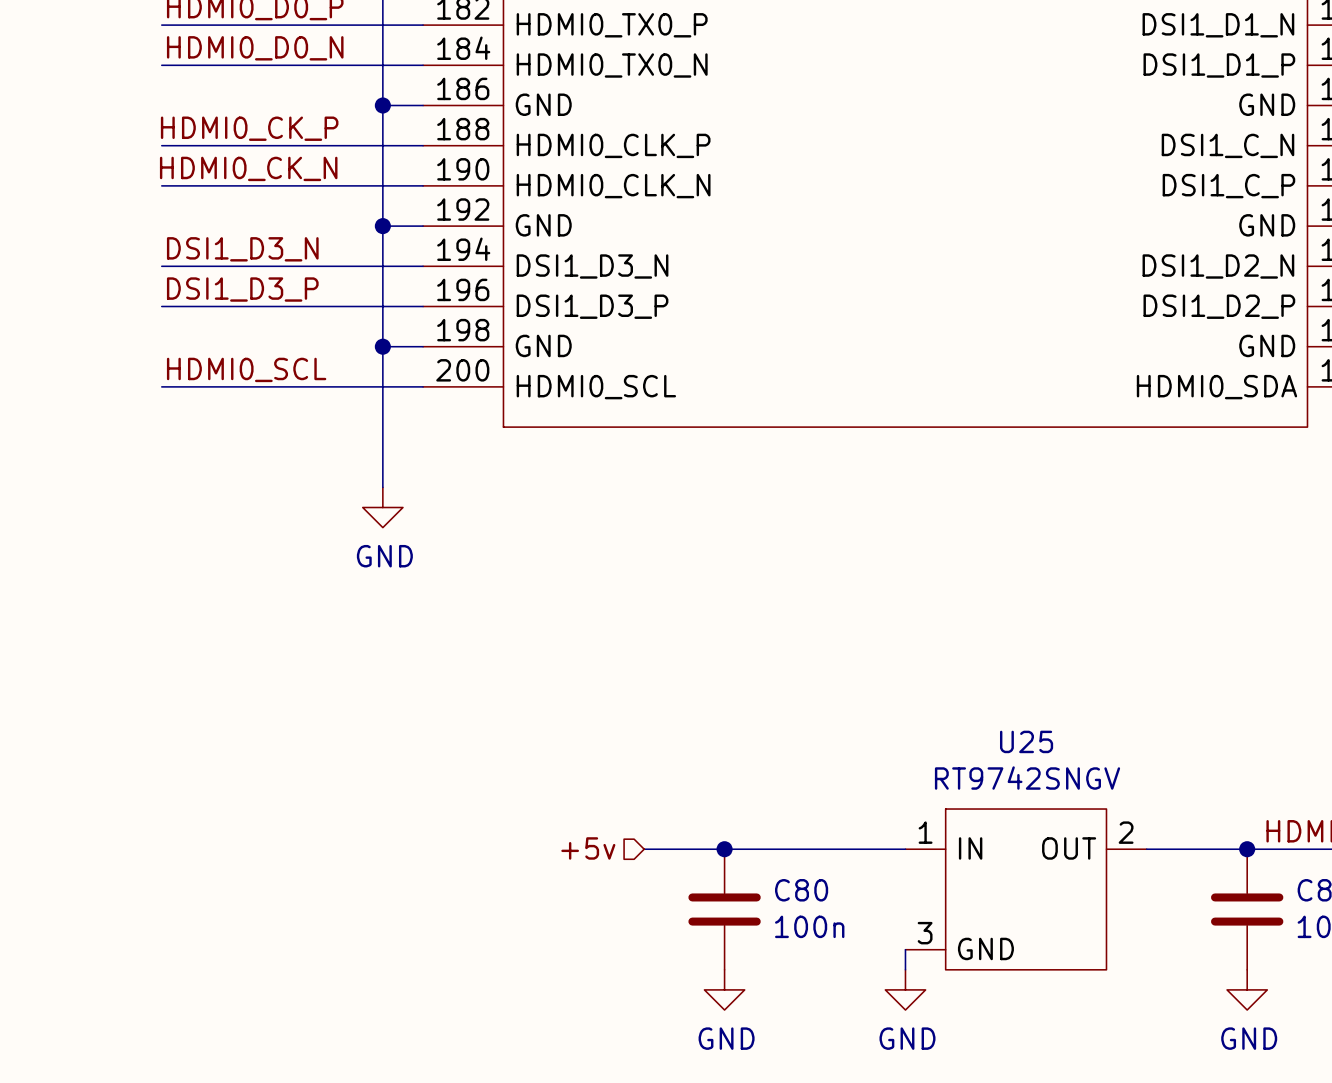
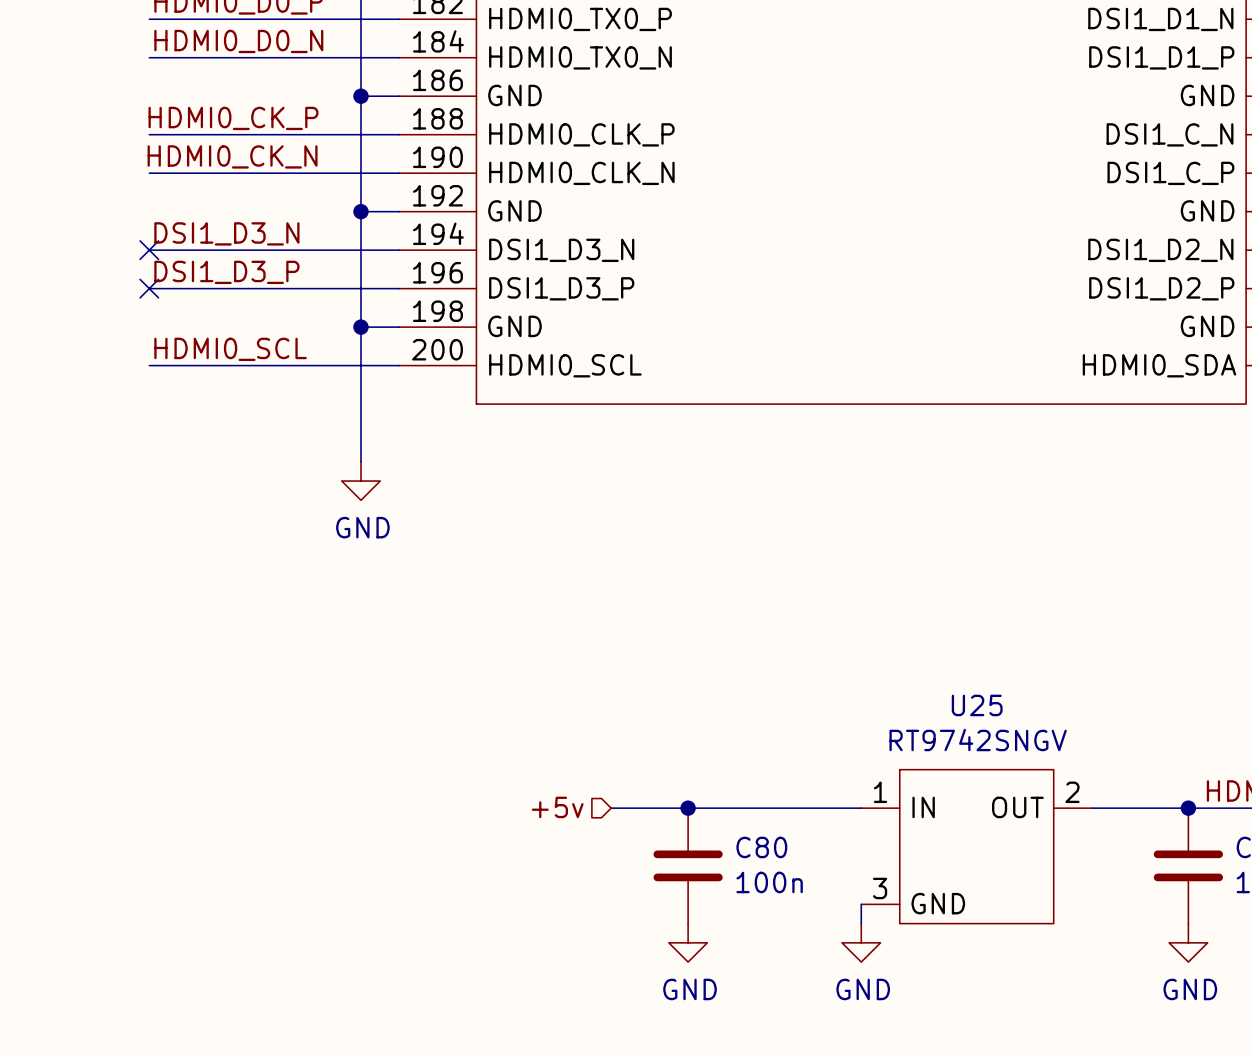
no-connect mark: none -> (149, 250)
no-connect mark: none -> (149, 288)

